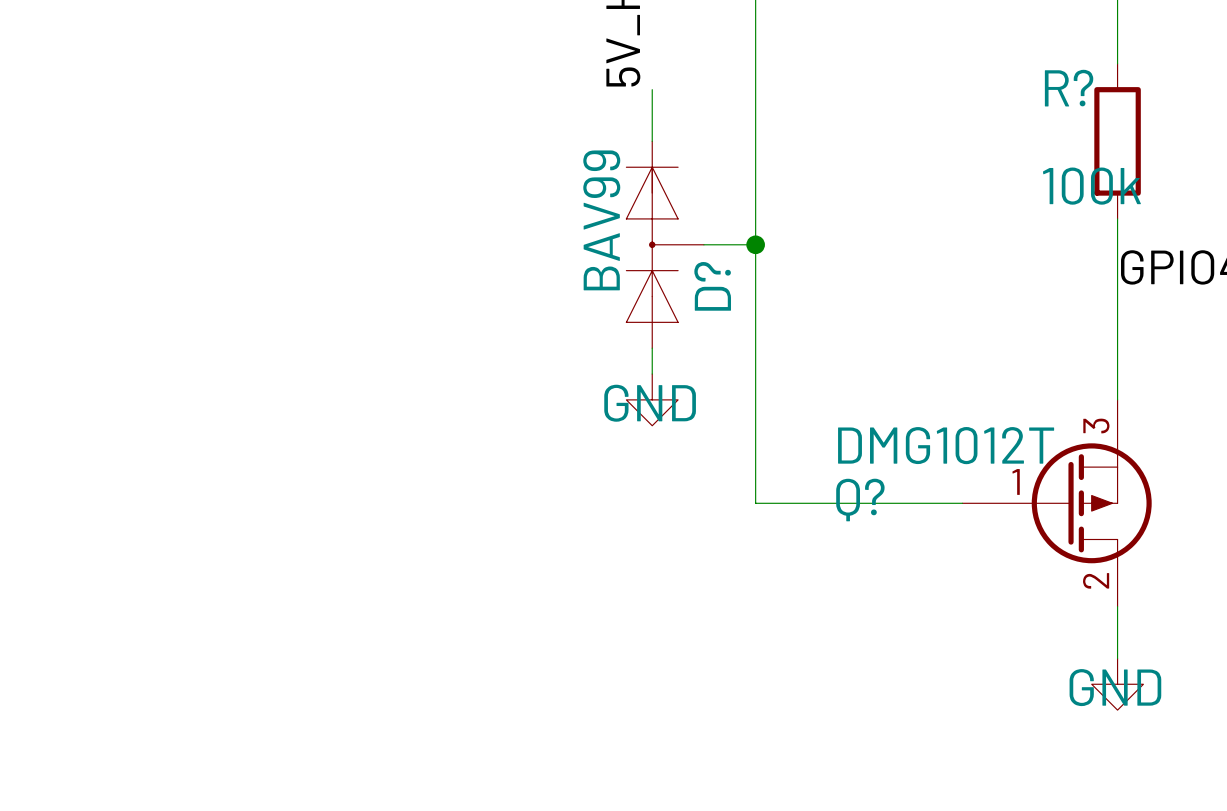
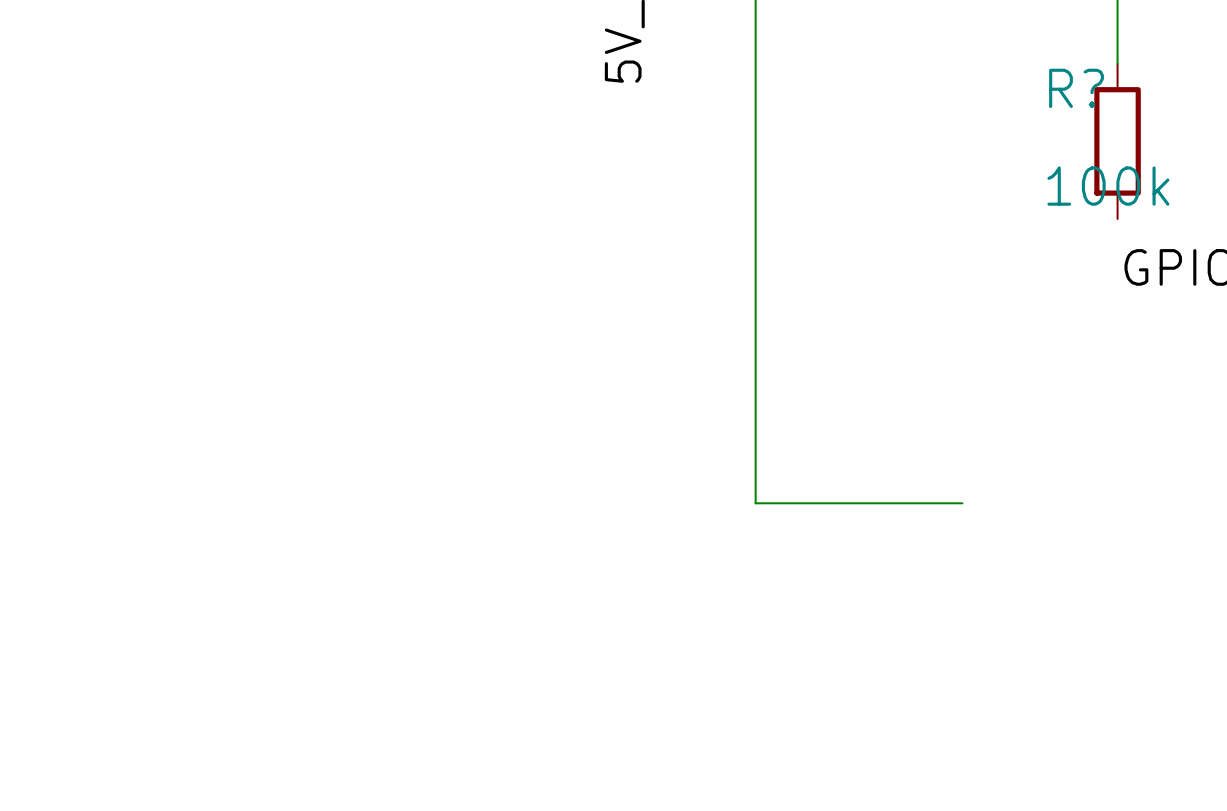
wire: (652, 89) (652, 141) -> none
wire: (1117, 218) (1117, 399) -> none
D?: BAV99 (665, 244) -> none
wire: (703, 244) (755, 244) -> none
junction: (755, 244) -> none
wire: (652, 348) (652, 374) -> none
power symbol: GND (652, 399) -> none
Q?: DMG1012T (1057, 503) -> none
wire: (1117, 606) (1117, 658) -> none
power symbol: GND (1117, 684) -> none

